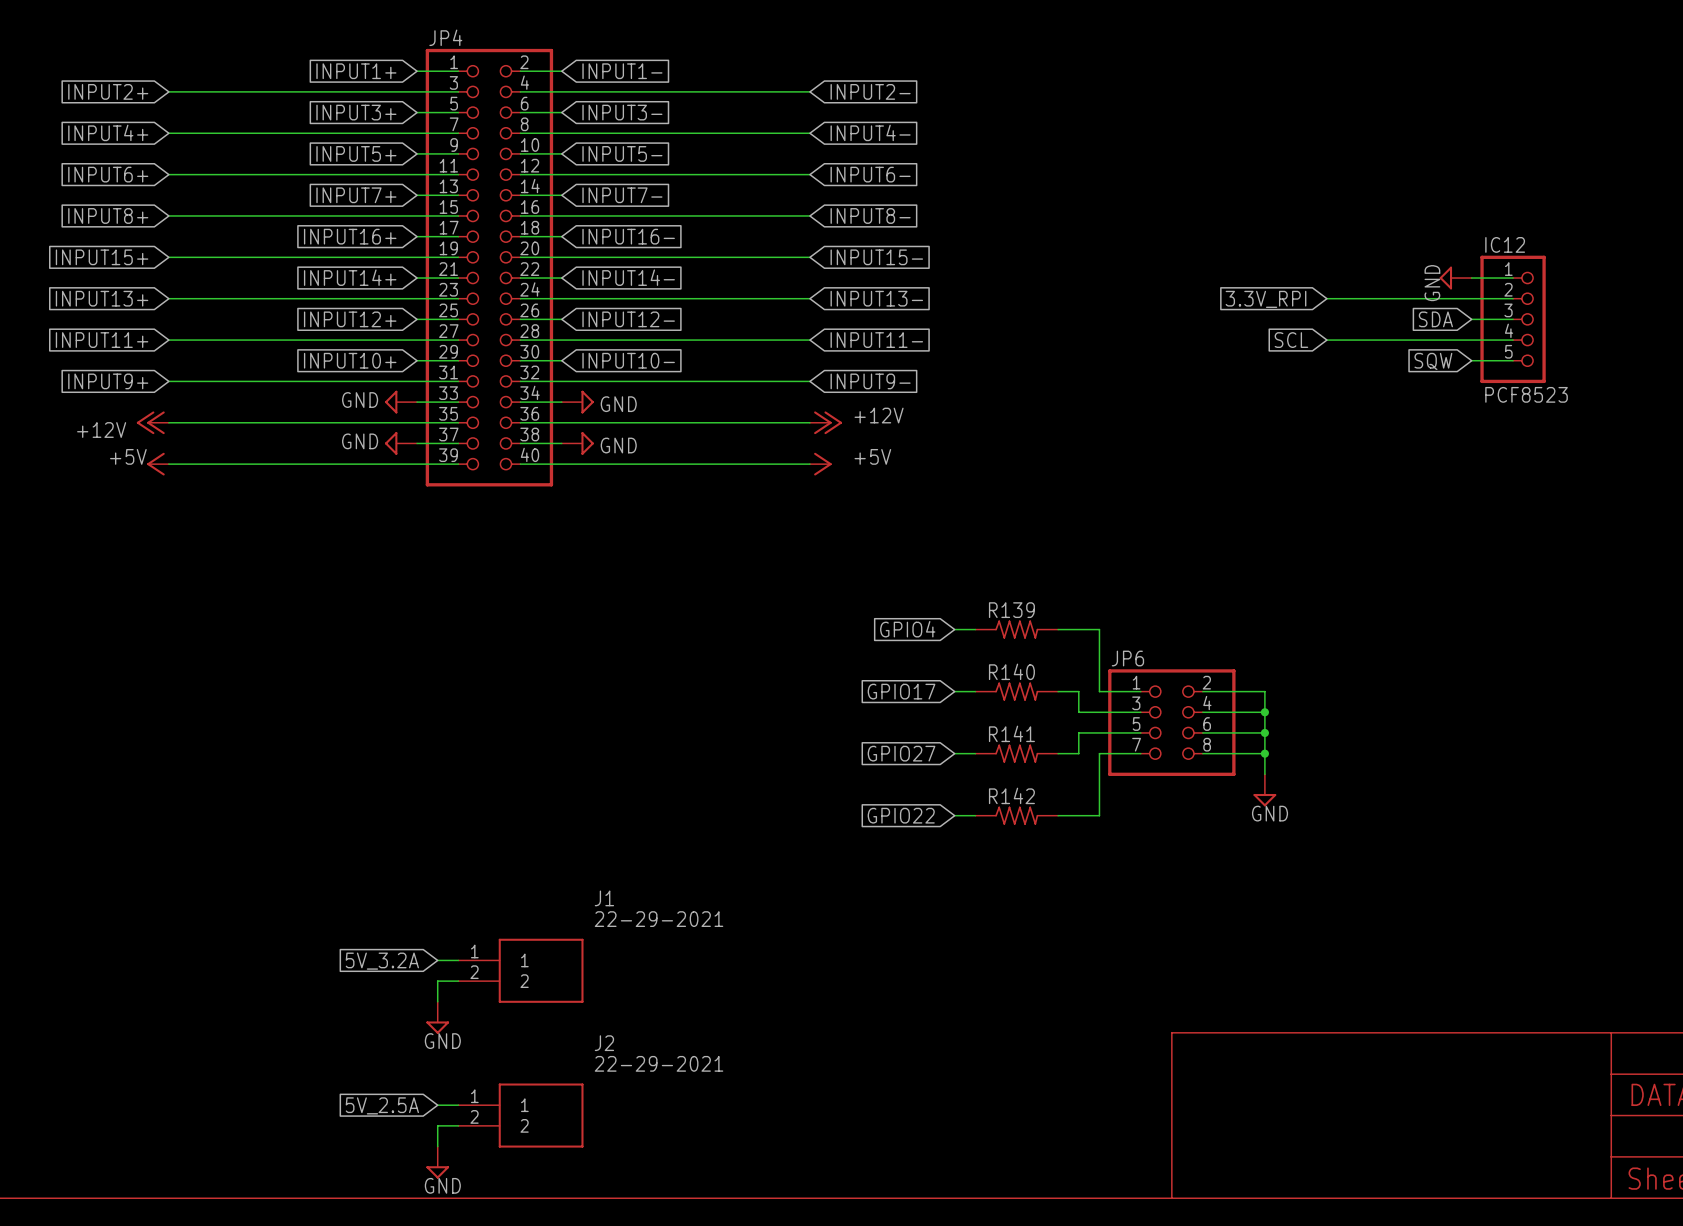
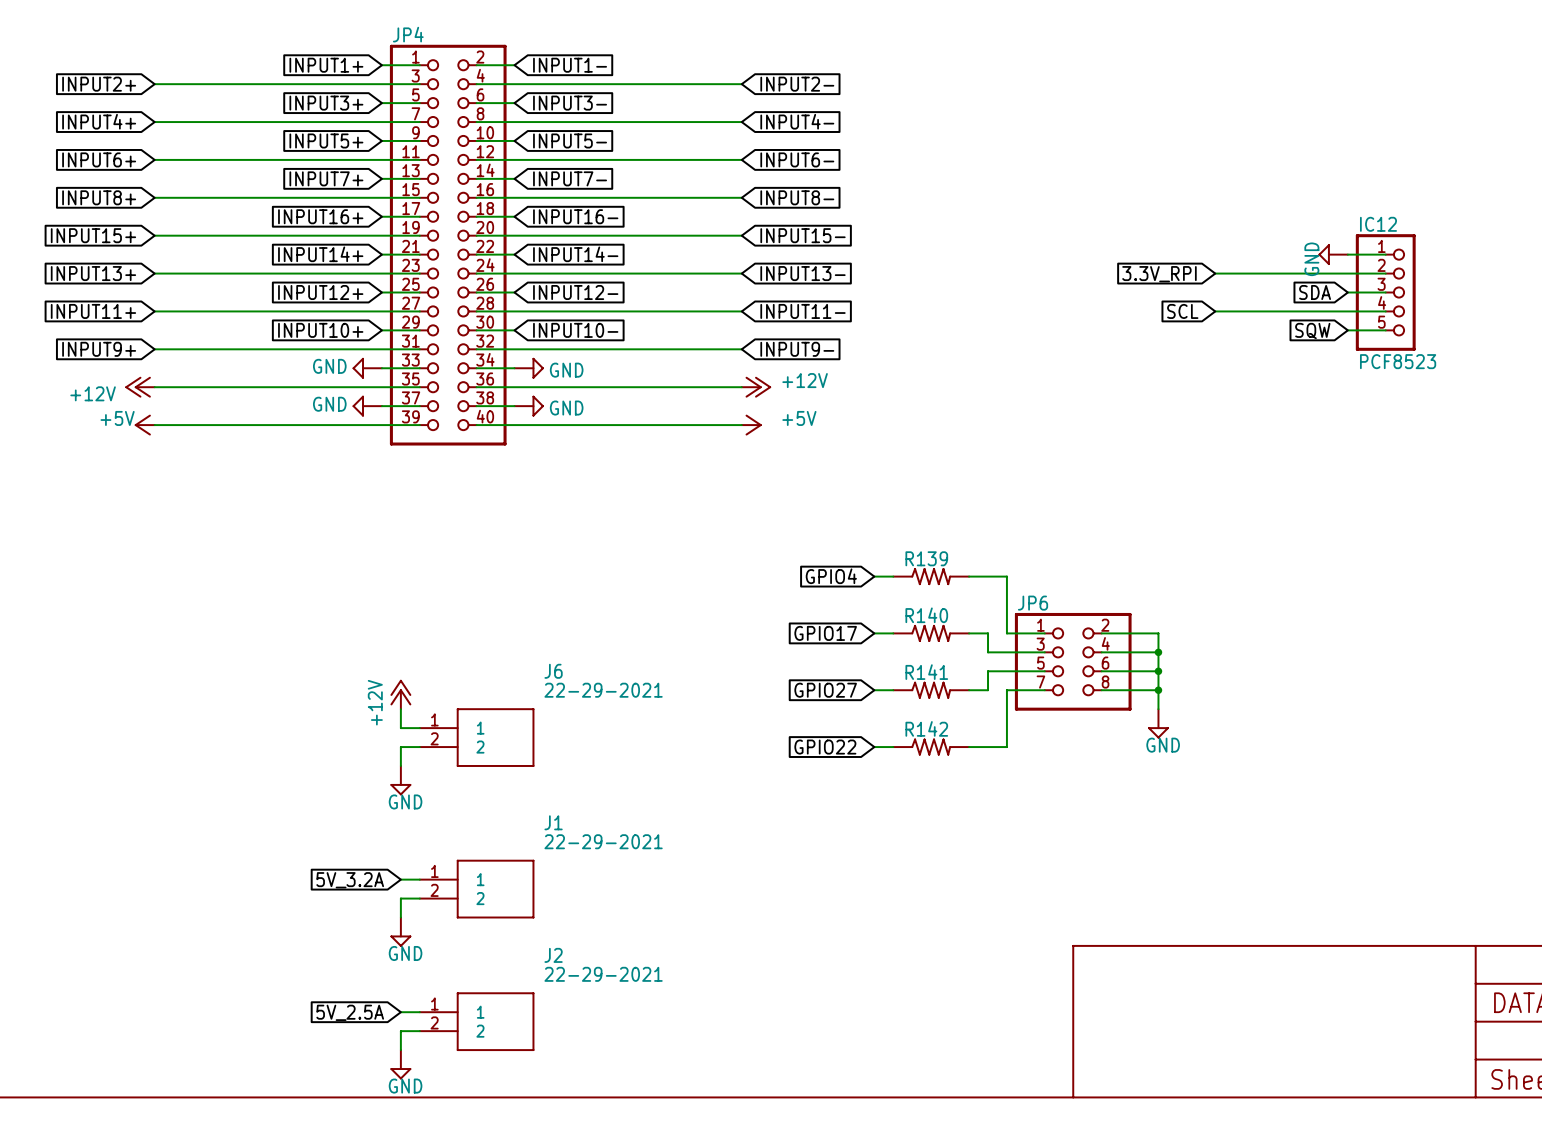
power symbol: none -> +12V (400, 694)
wire: none -> (400, 709) (400, 728) (419, 728)
J6: none -> 22-29-2021 (477, 737)
wire: none -> (419, 747) (400, 747) (400, 765)
power symbol: none -> GND (400, 780)

